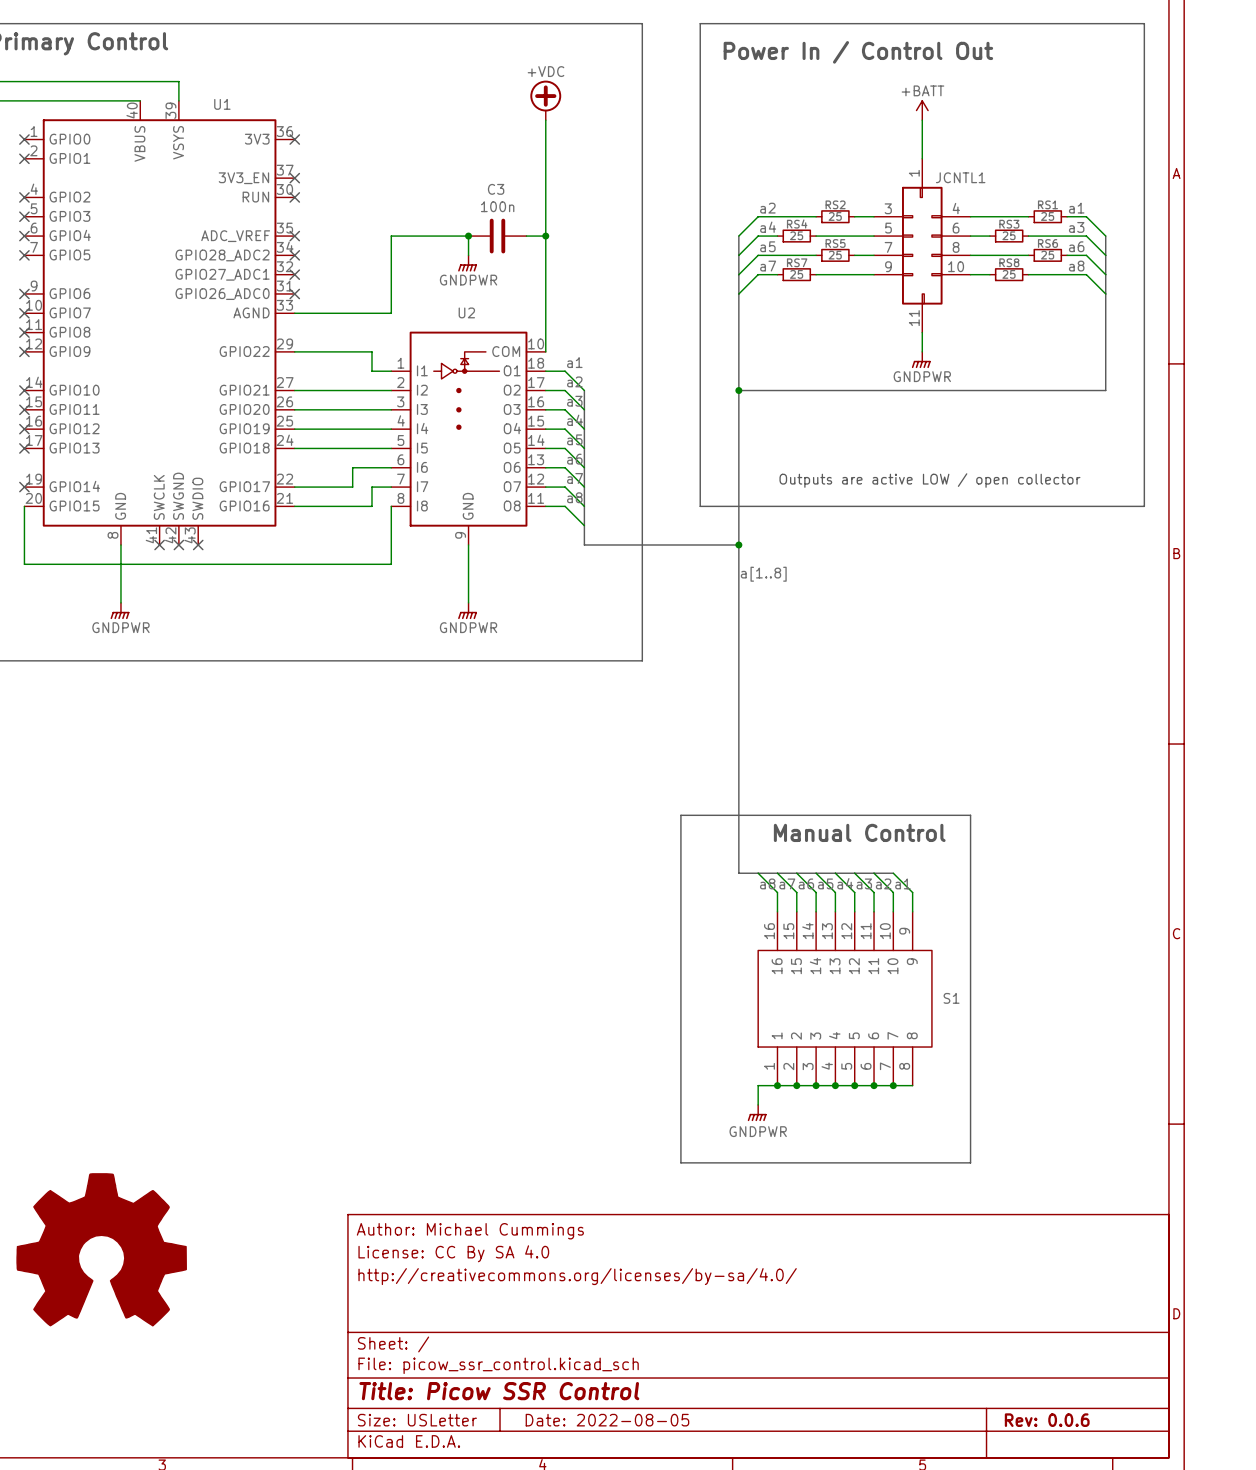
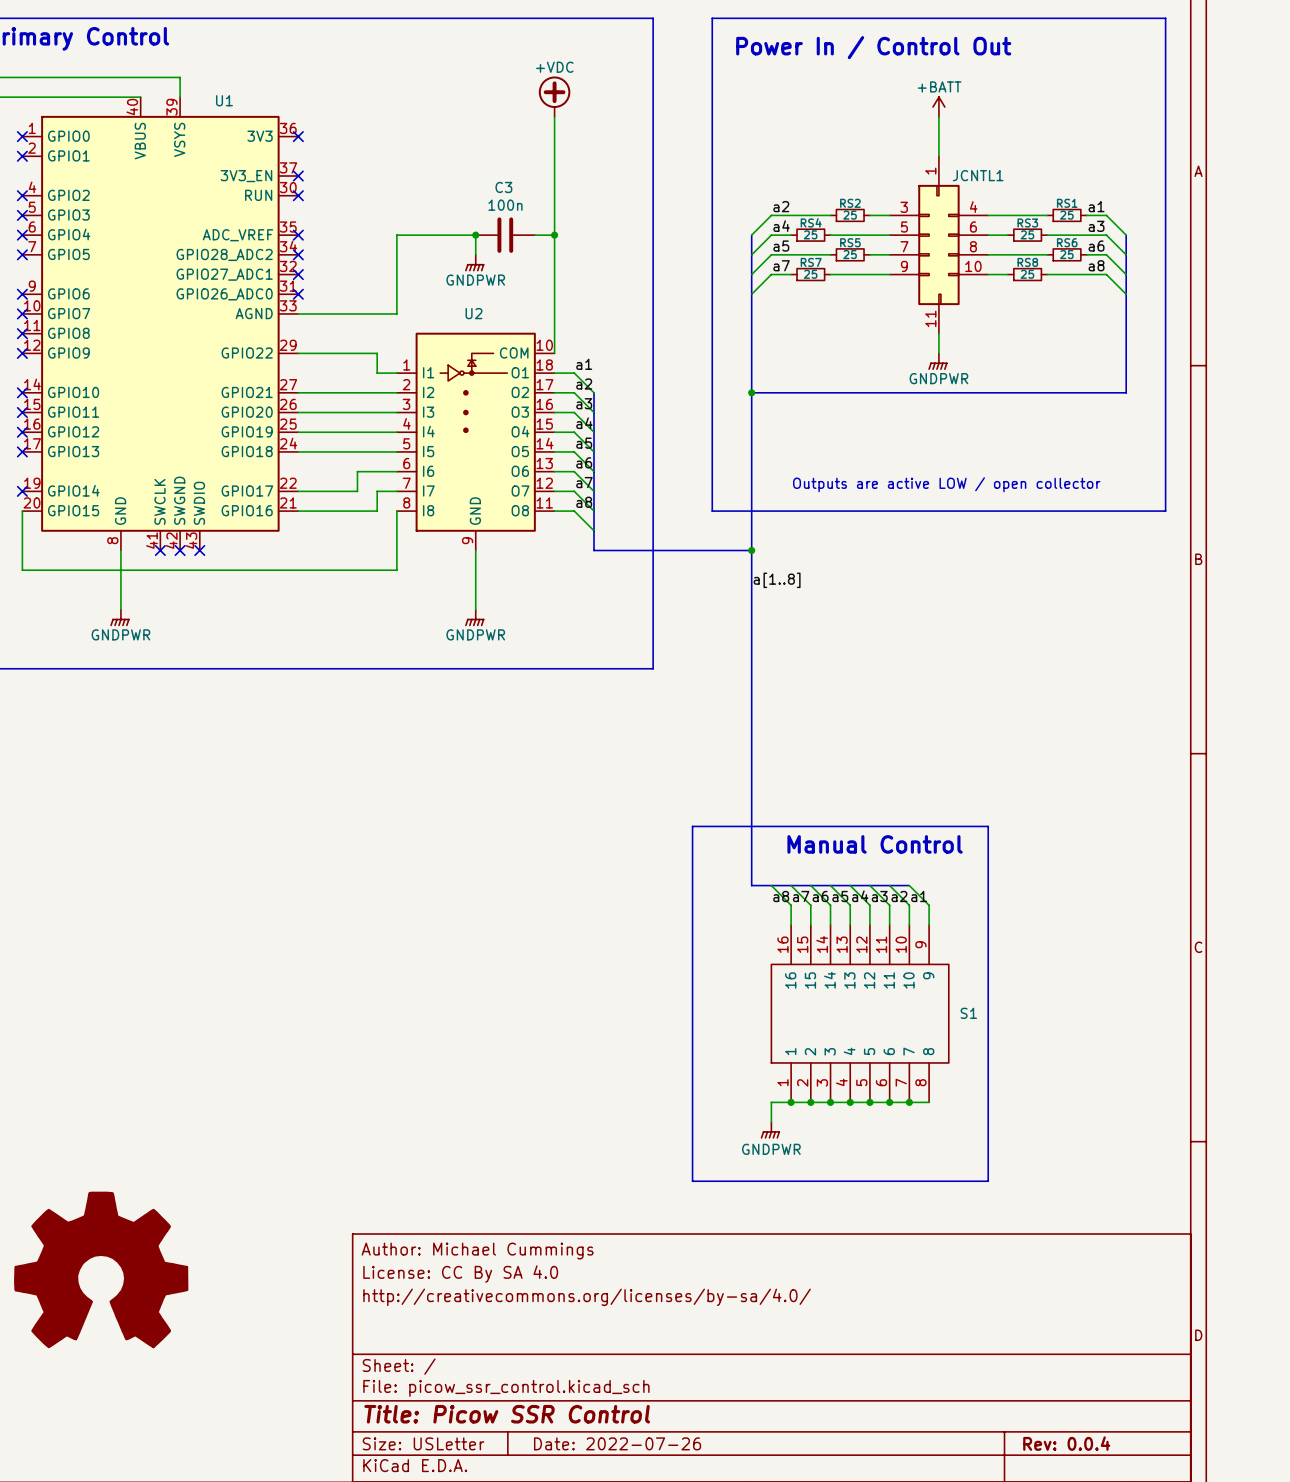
title block: Date: 2022-08-05 (607, 1420) -> Date: 2022-07-26 (617, 1443)
title block: Rev: 0.0.6 (1047, 1420) -> Rev: 0.0.4 (1066, 1443)

